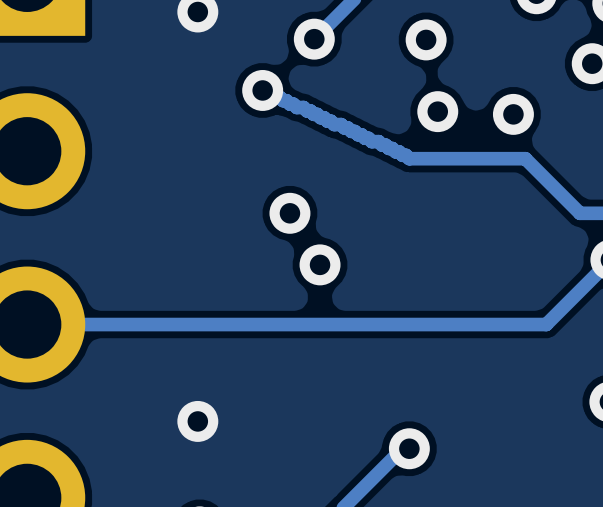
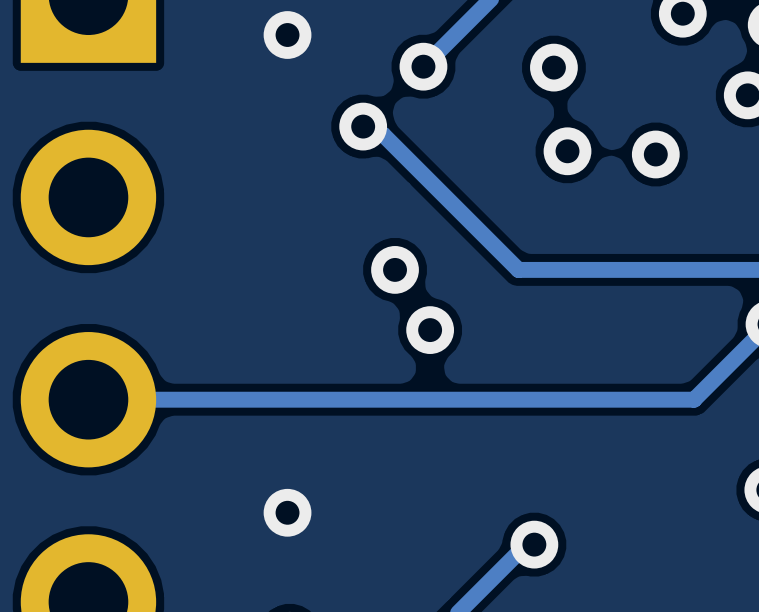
track: (283, 100) (293, 104) (296, 107) (303, 107) (334, 124) (341, 124) (371, 141) (378, 141) (409, 158) (525, 158) (579, 213) -> (387, 138) (518, 269) (733, 269)

